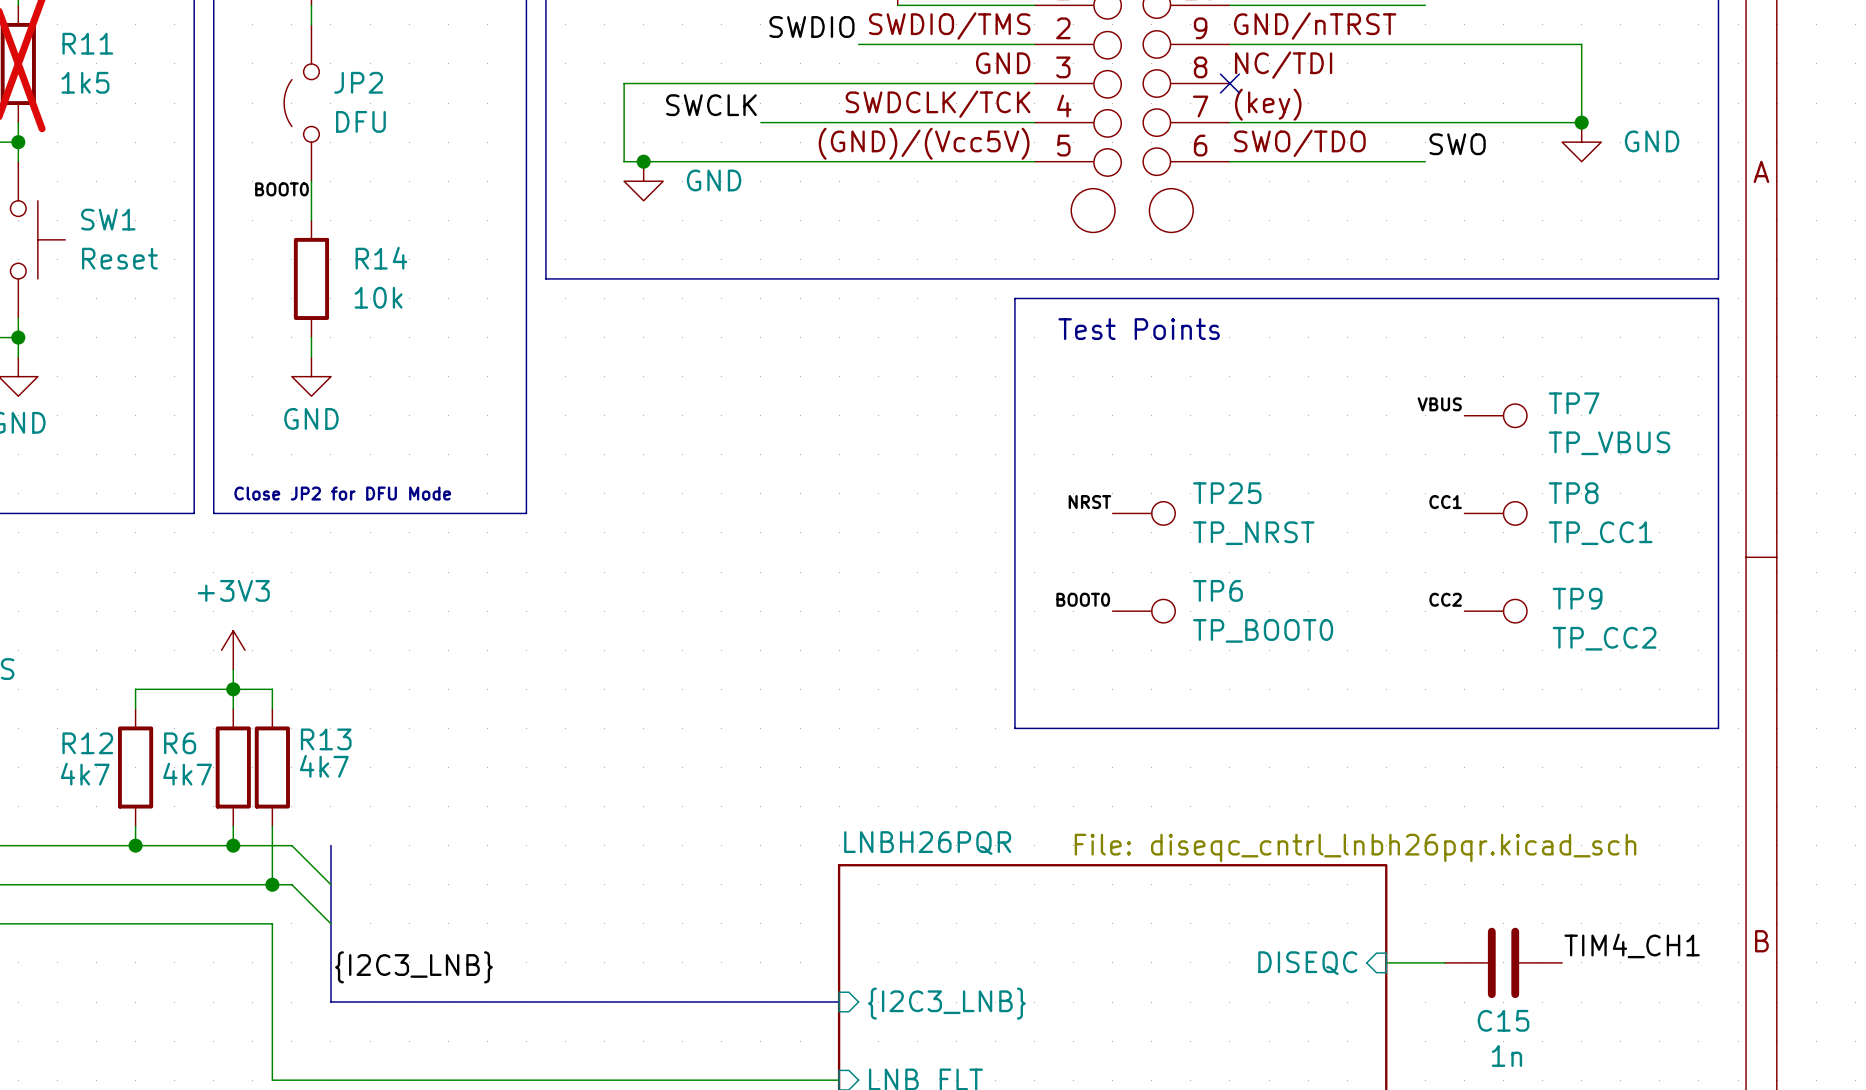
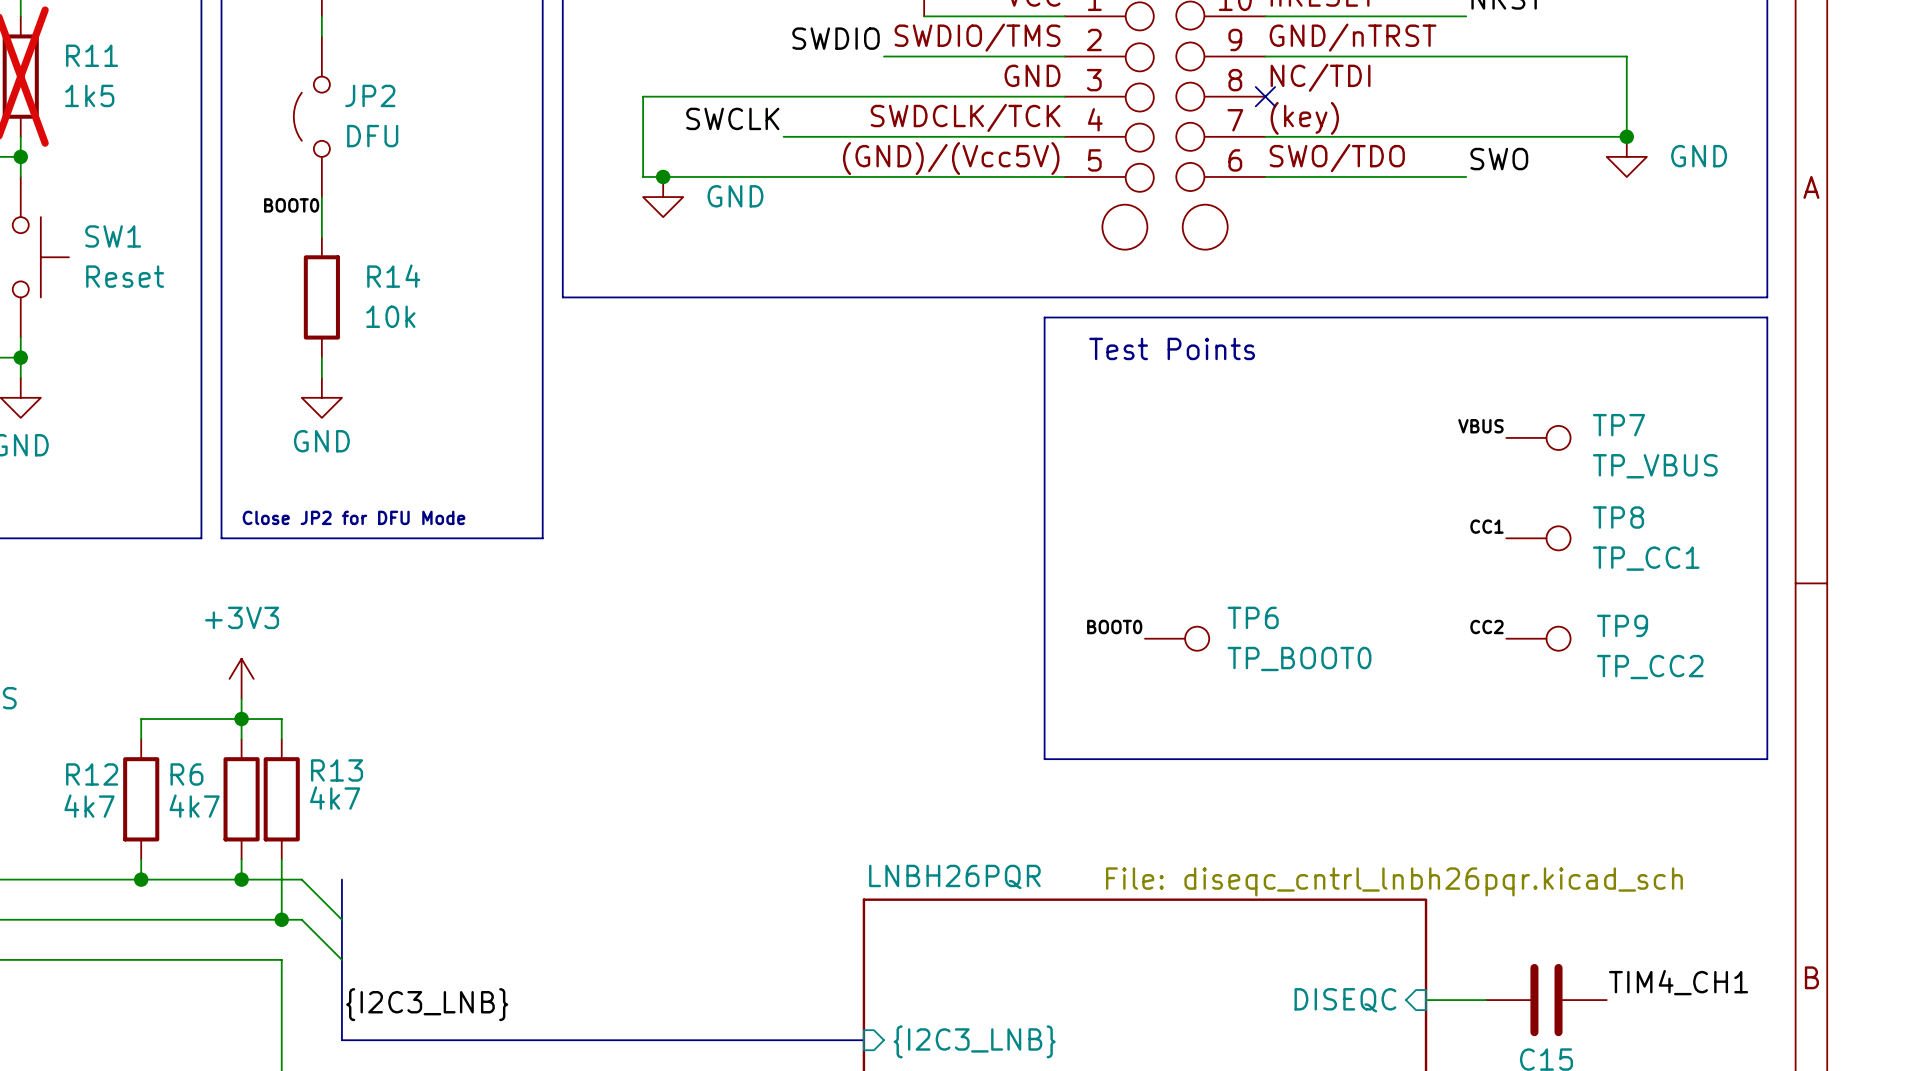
label: NRST (1089, 502) -> none
TP25: TP_NRST (1143, 513) -> none

